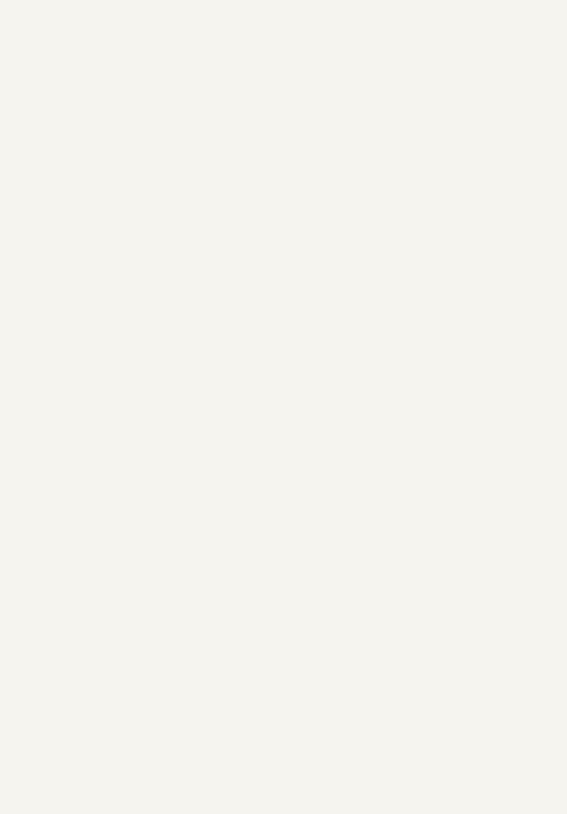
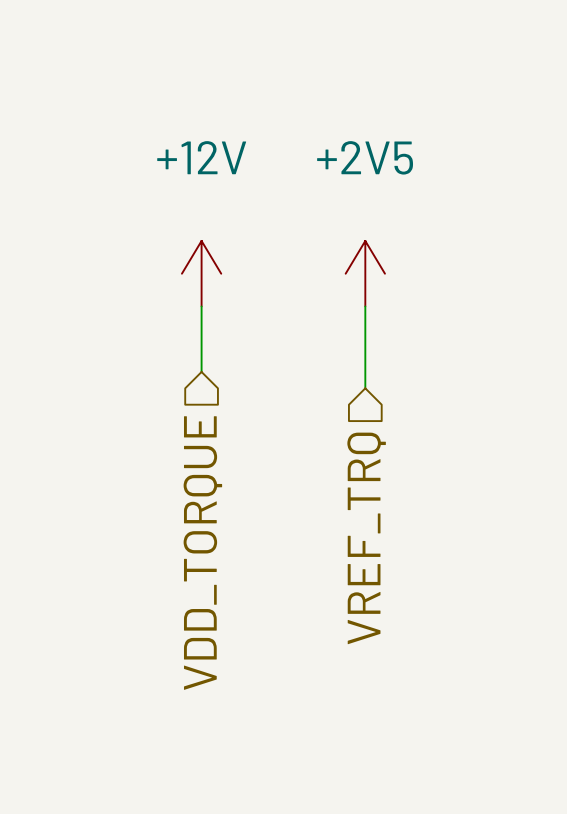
power symbol: none -> +12V (201, 273)
power symbol: none -> +2V5 (365, 273)
wire: none -> (201, 306) (201, 371)
wire: none -> (365, 306) (365, 388)
hierarchical label: none -> VREF_TRQ (366, 538)
hierarchical label: none -> VDD_TORQUE (202, 553)

